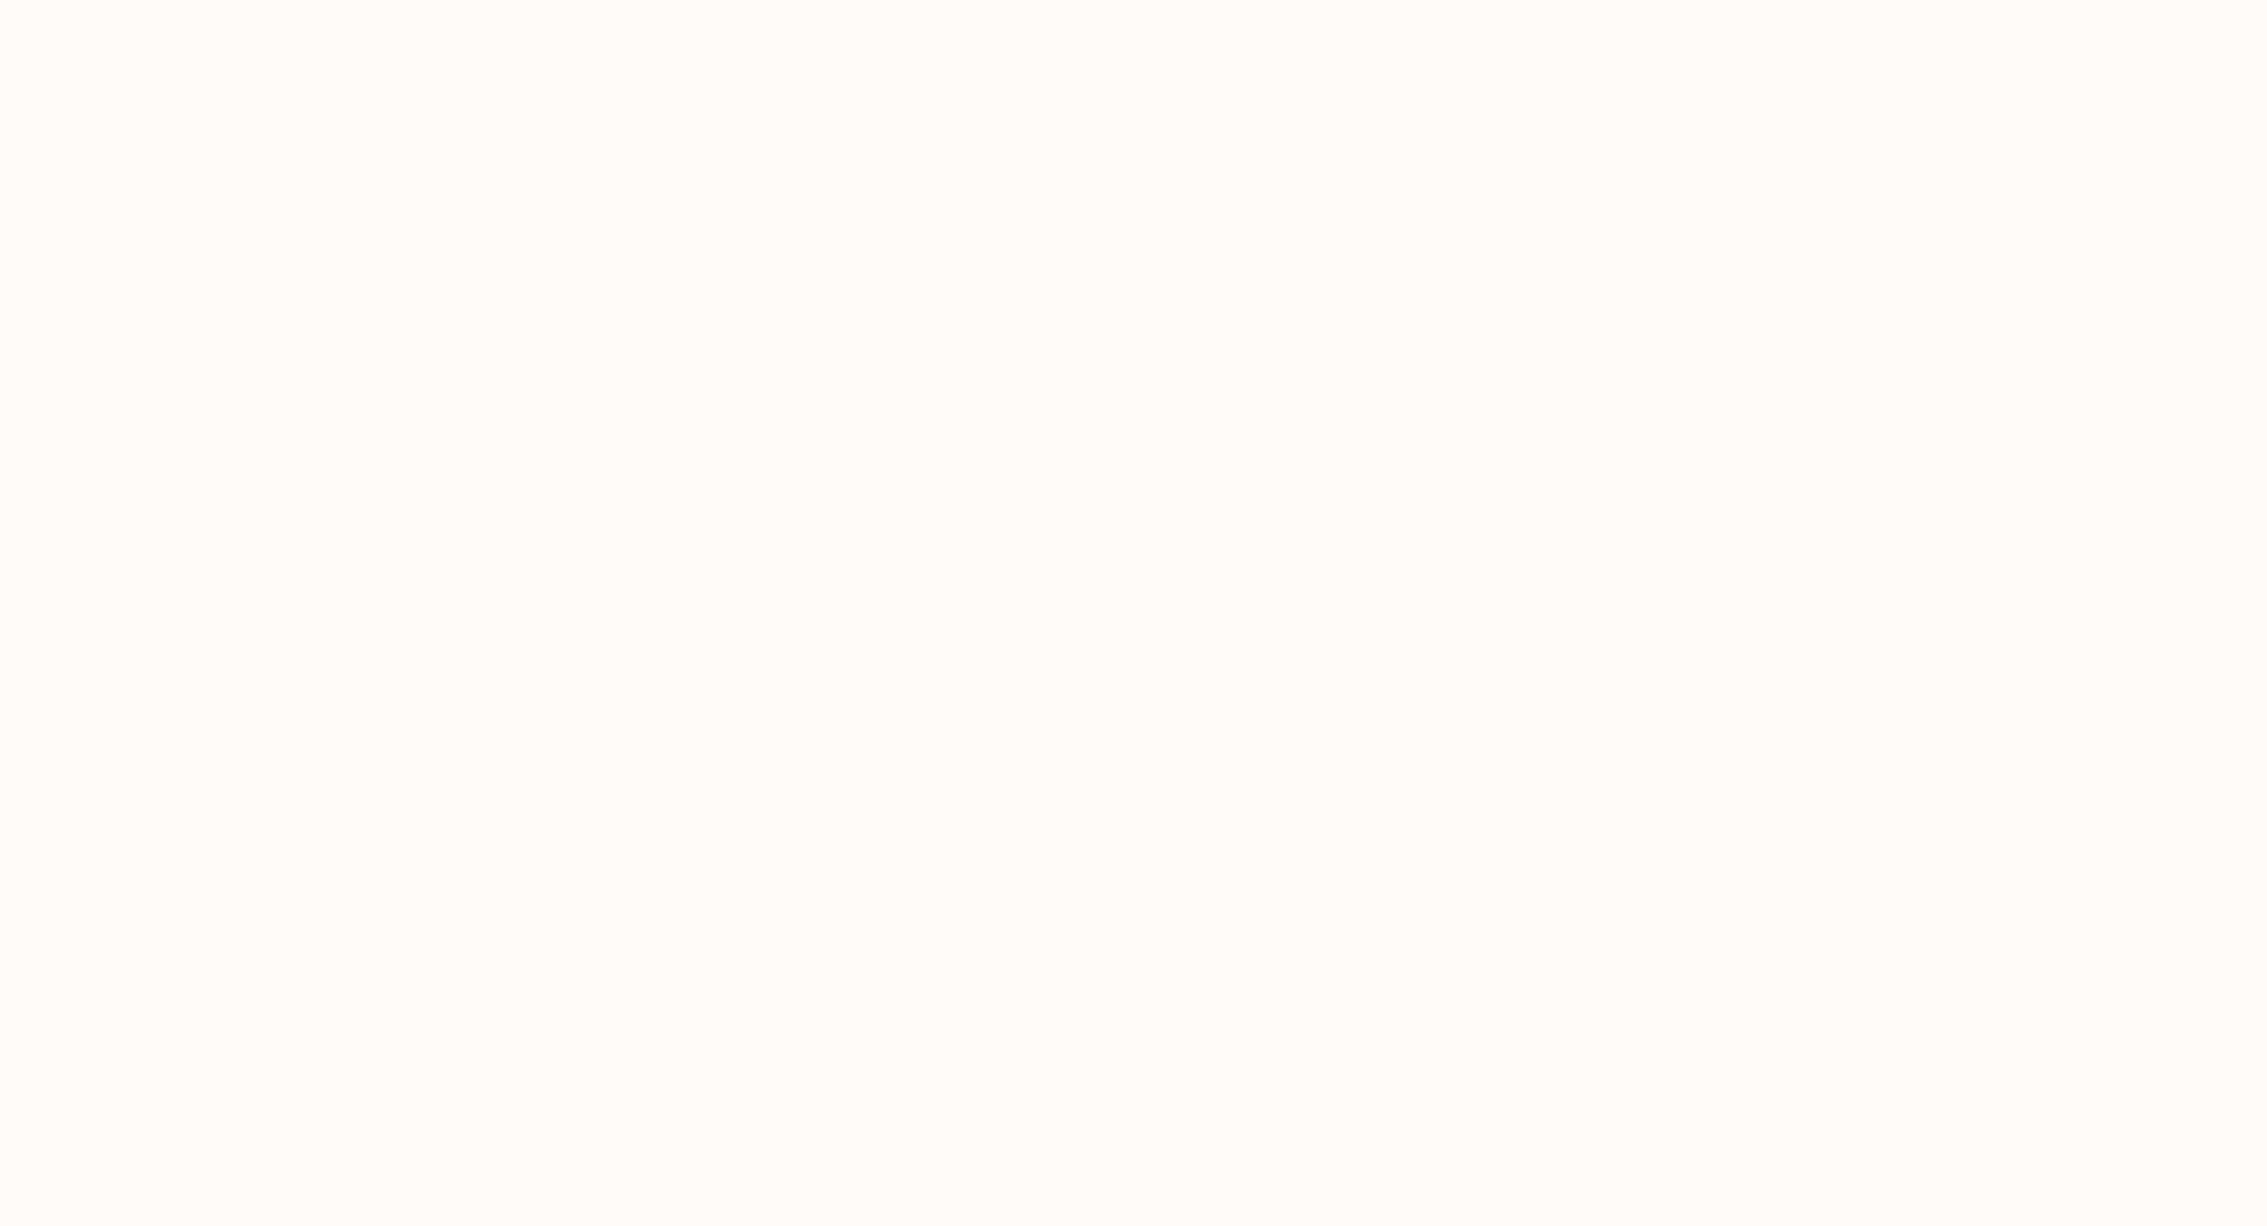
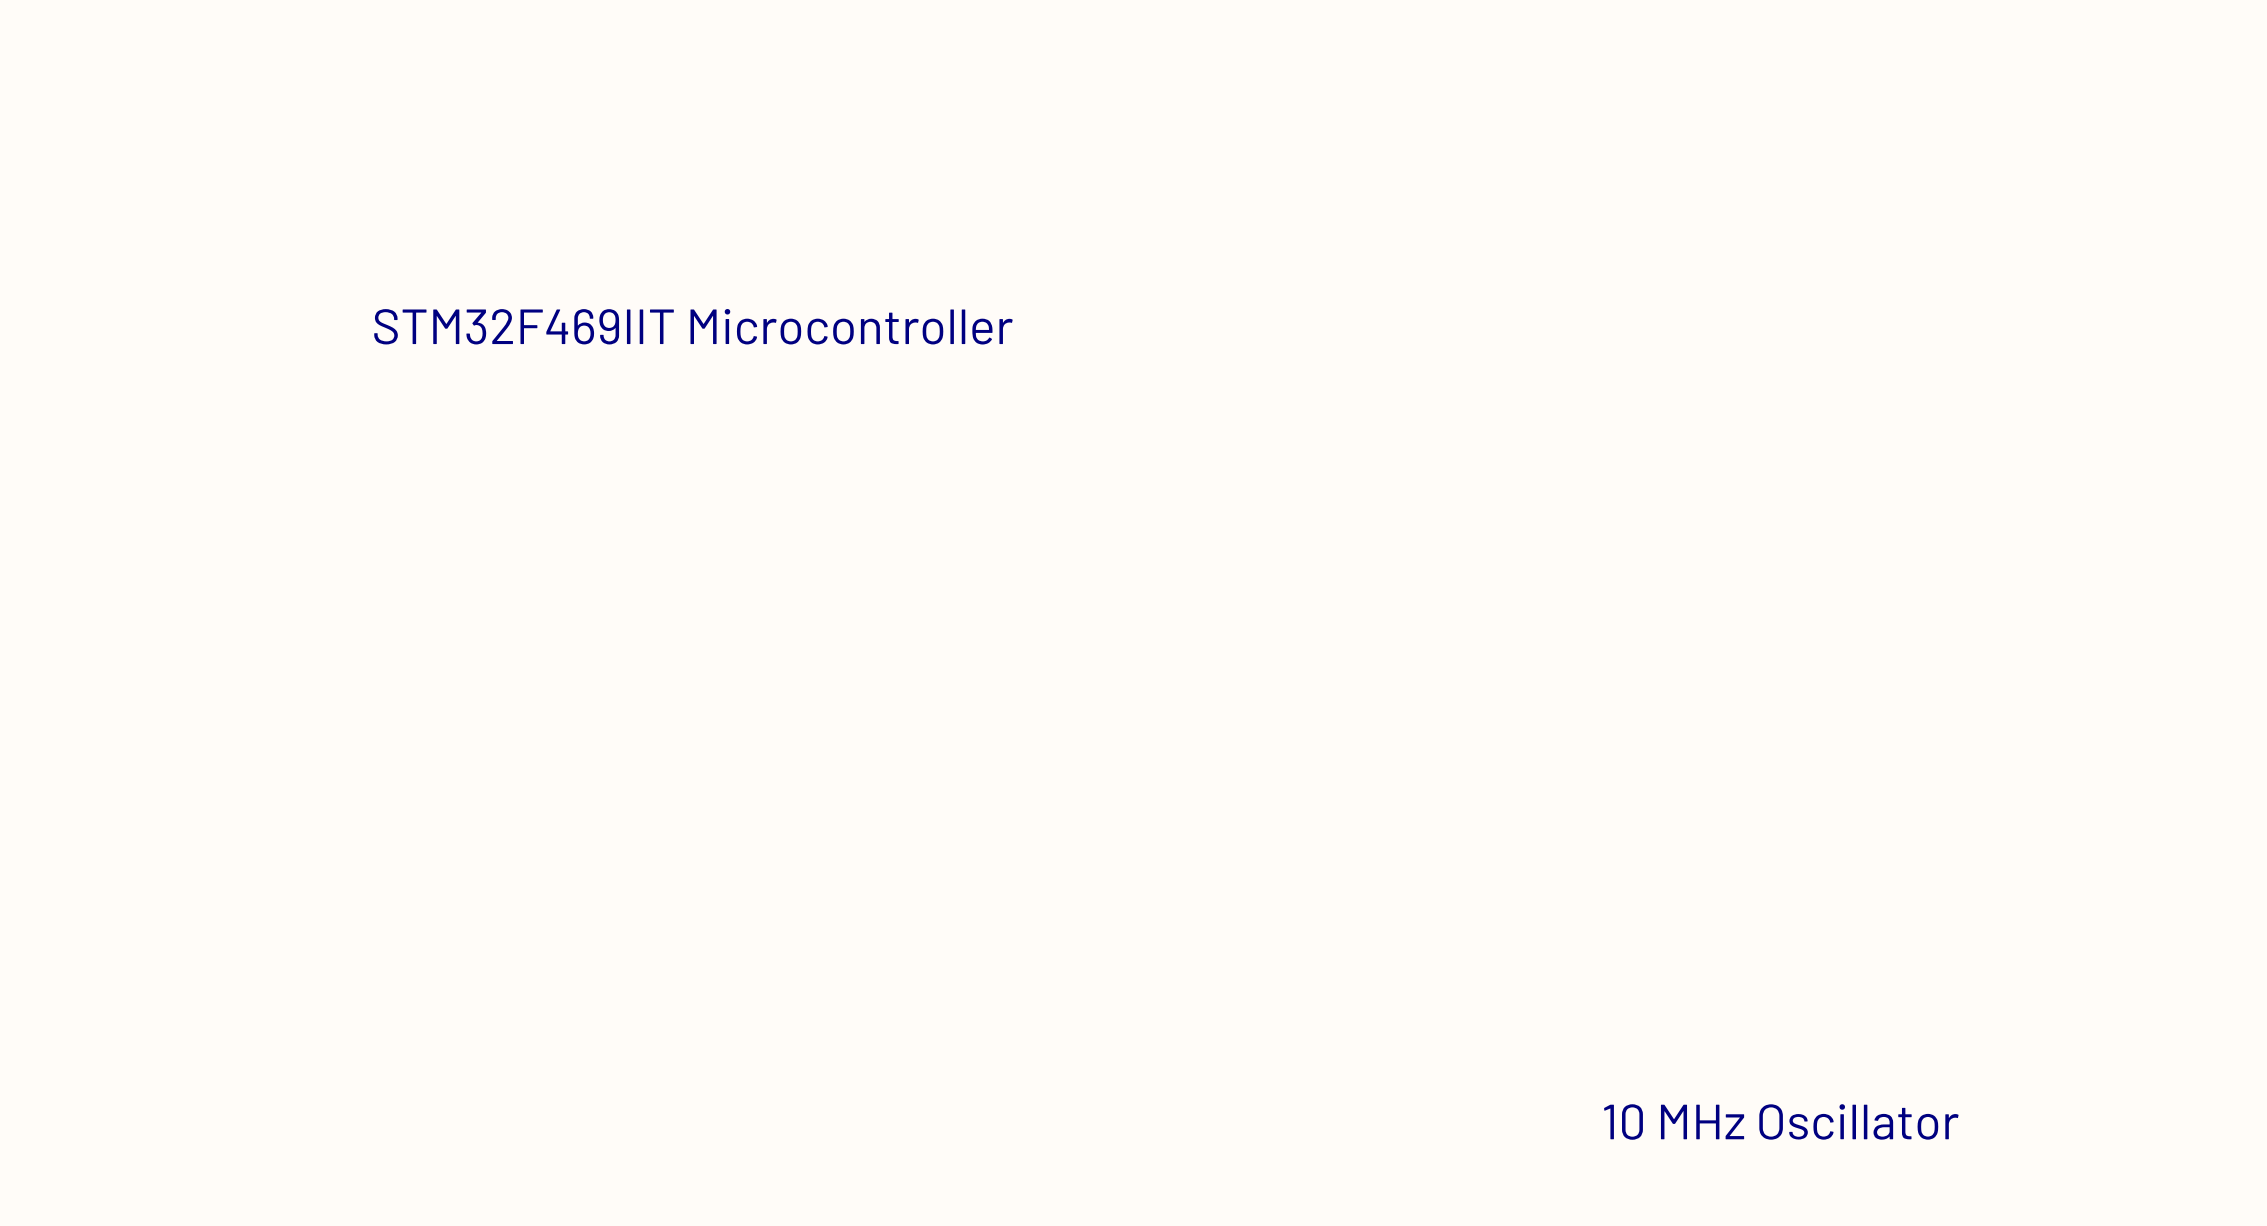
text: none -> STM32F469IIT Microcontroller (693, 326)
text: none -> 10 MHz Oscillator (1781, 1121)

